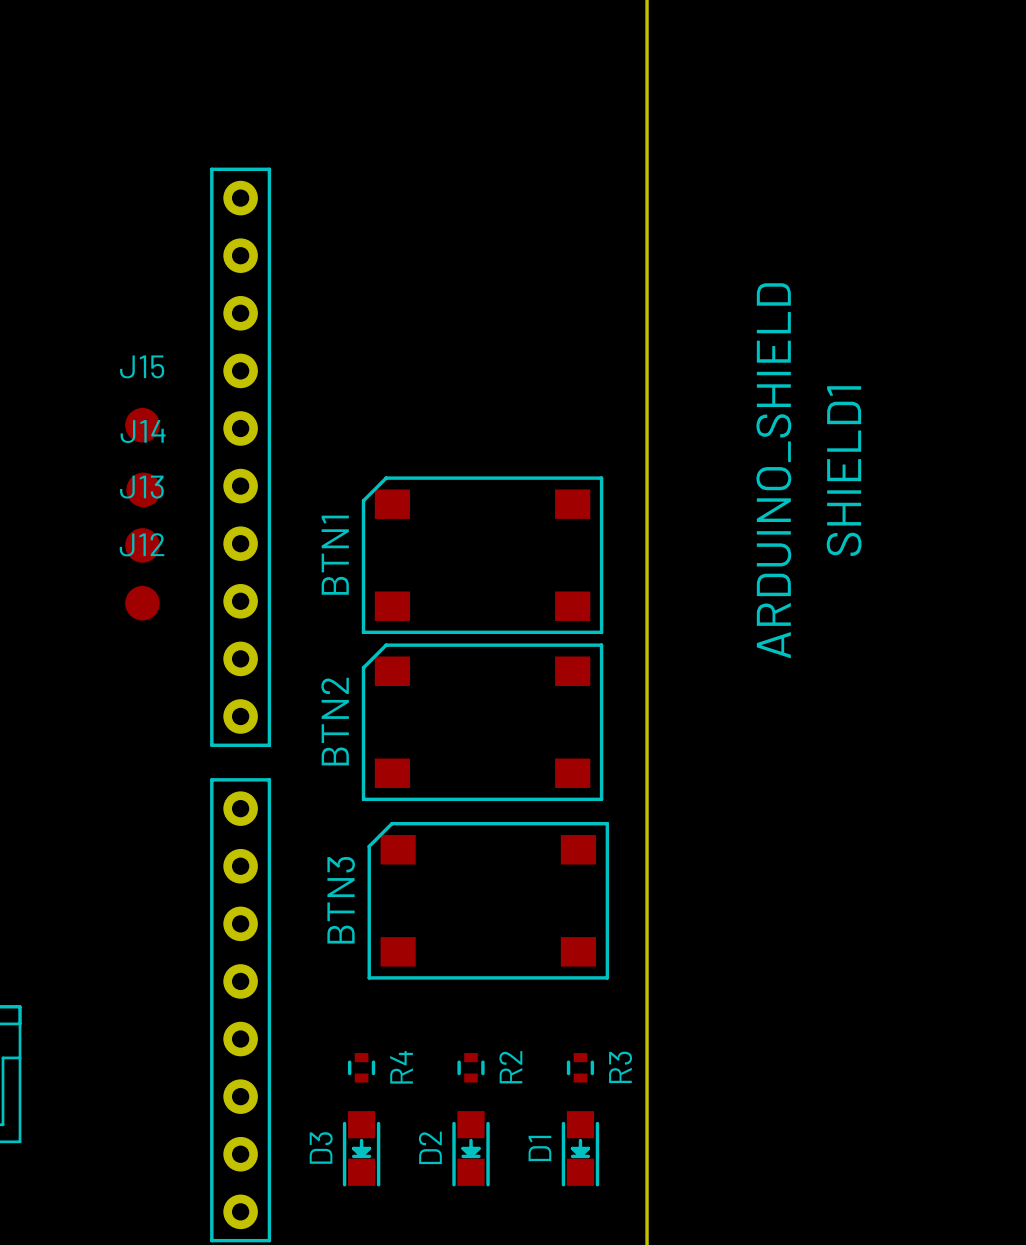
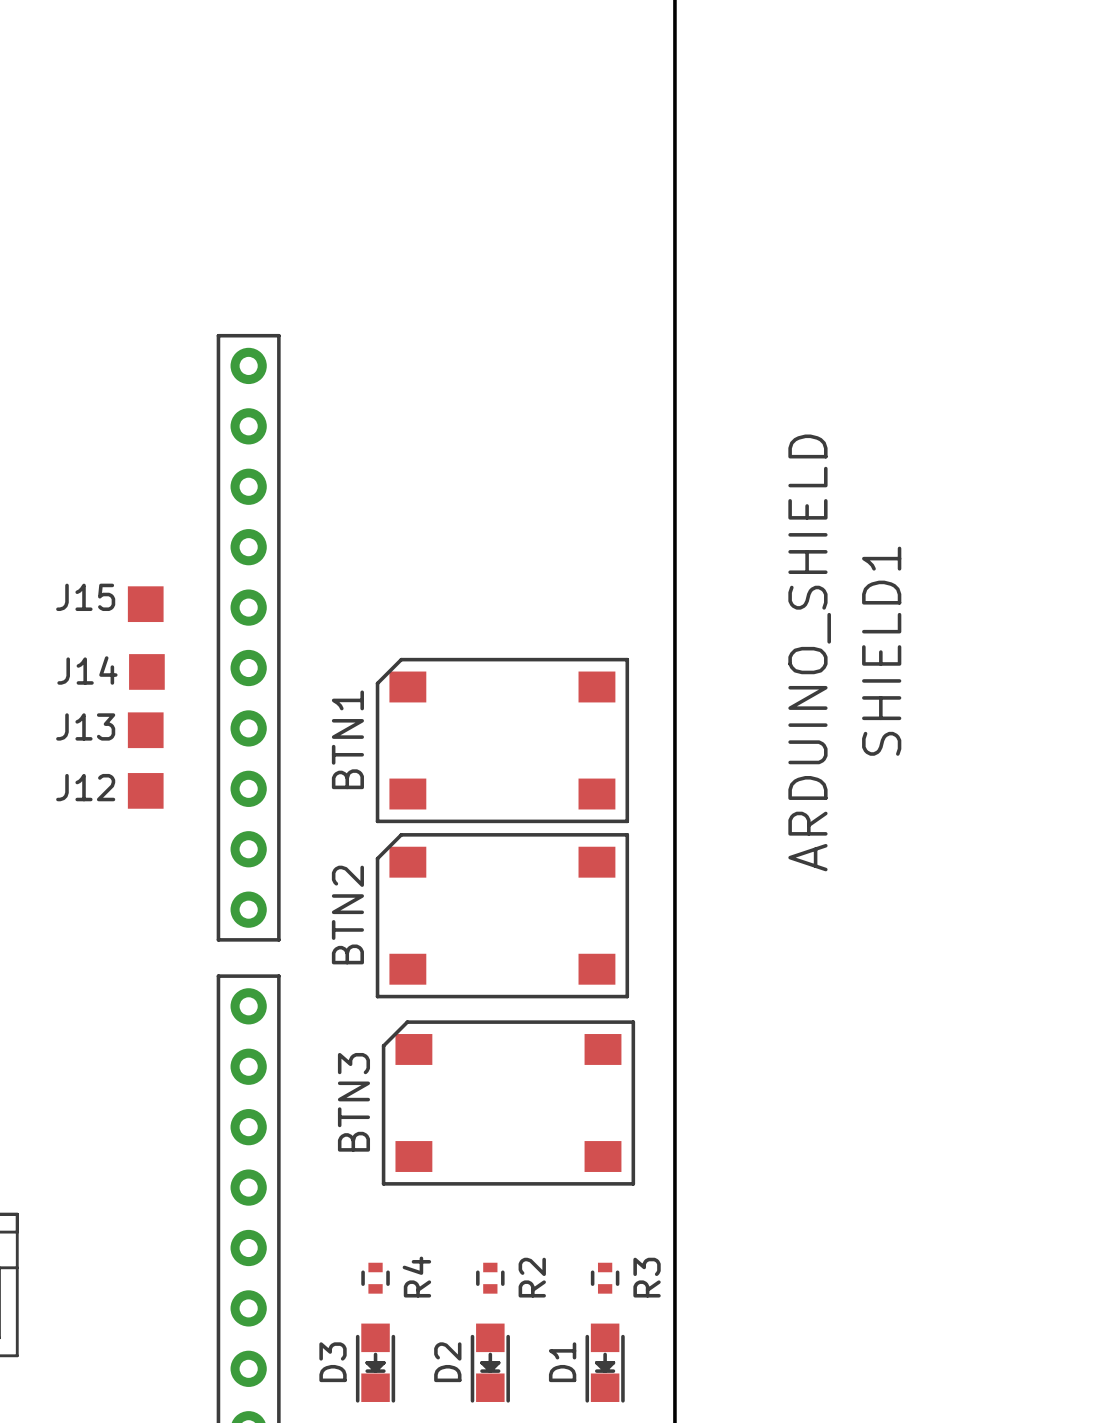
J15 name position: J15 (142, 366) -> J15 (85, 597)
J15 footprint: [125, 407, 160, 443] -> [127, 586, 164, 623]
J14 name position: J14 (143, 431) -> J14 (87, 670)
J14 footprint: [126, 472, 161, 508] -> [129, 654, 165, 690]
J13 name position: J13 (141, 487) -> J13 (85, 726)
J13 footprint: [125, 528, 160, 563] -> [127, 712, 164, 749]
J12 name position: J12 (142, 544) -> J12 (85, 787)
J12 footprint: [125, 585, 160, 621] -> [127, 773, 164, 809]

